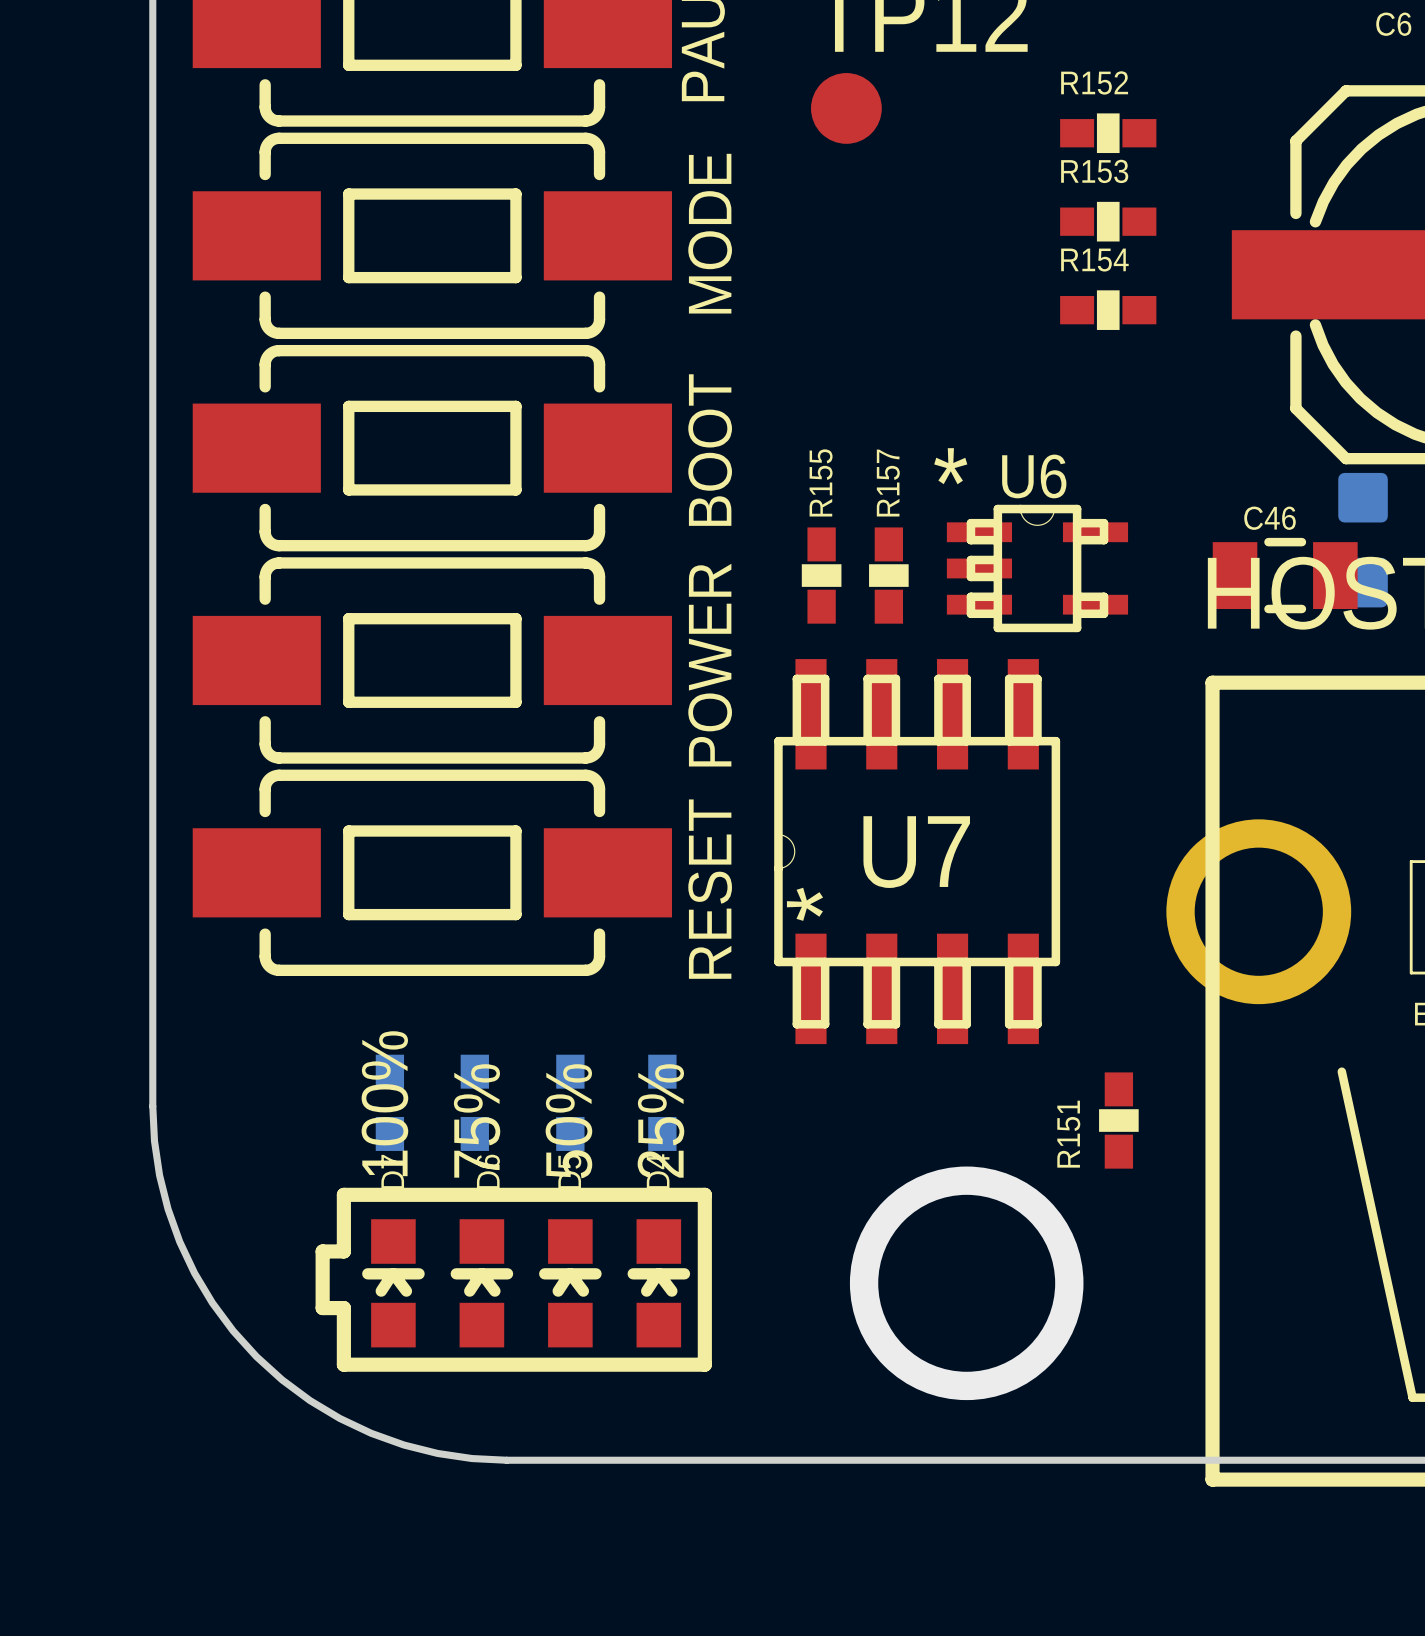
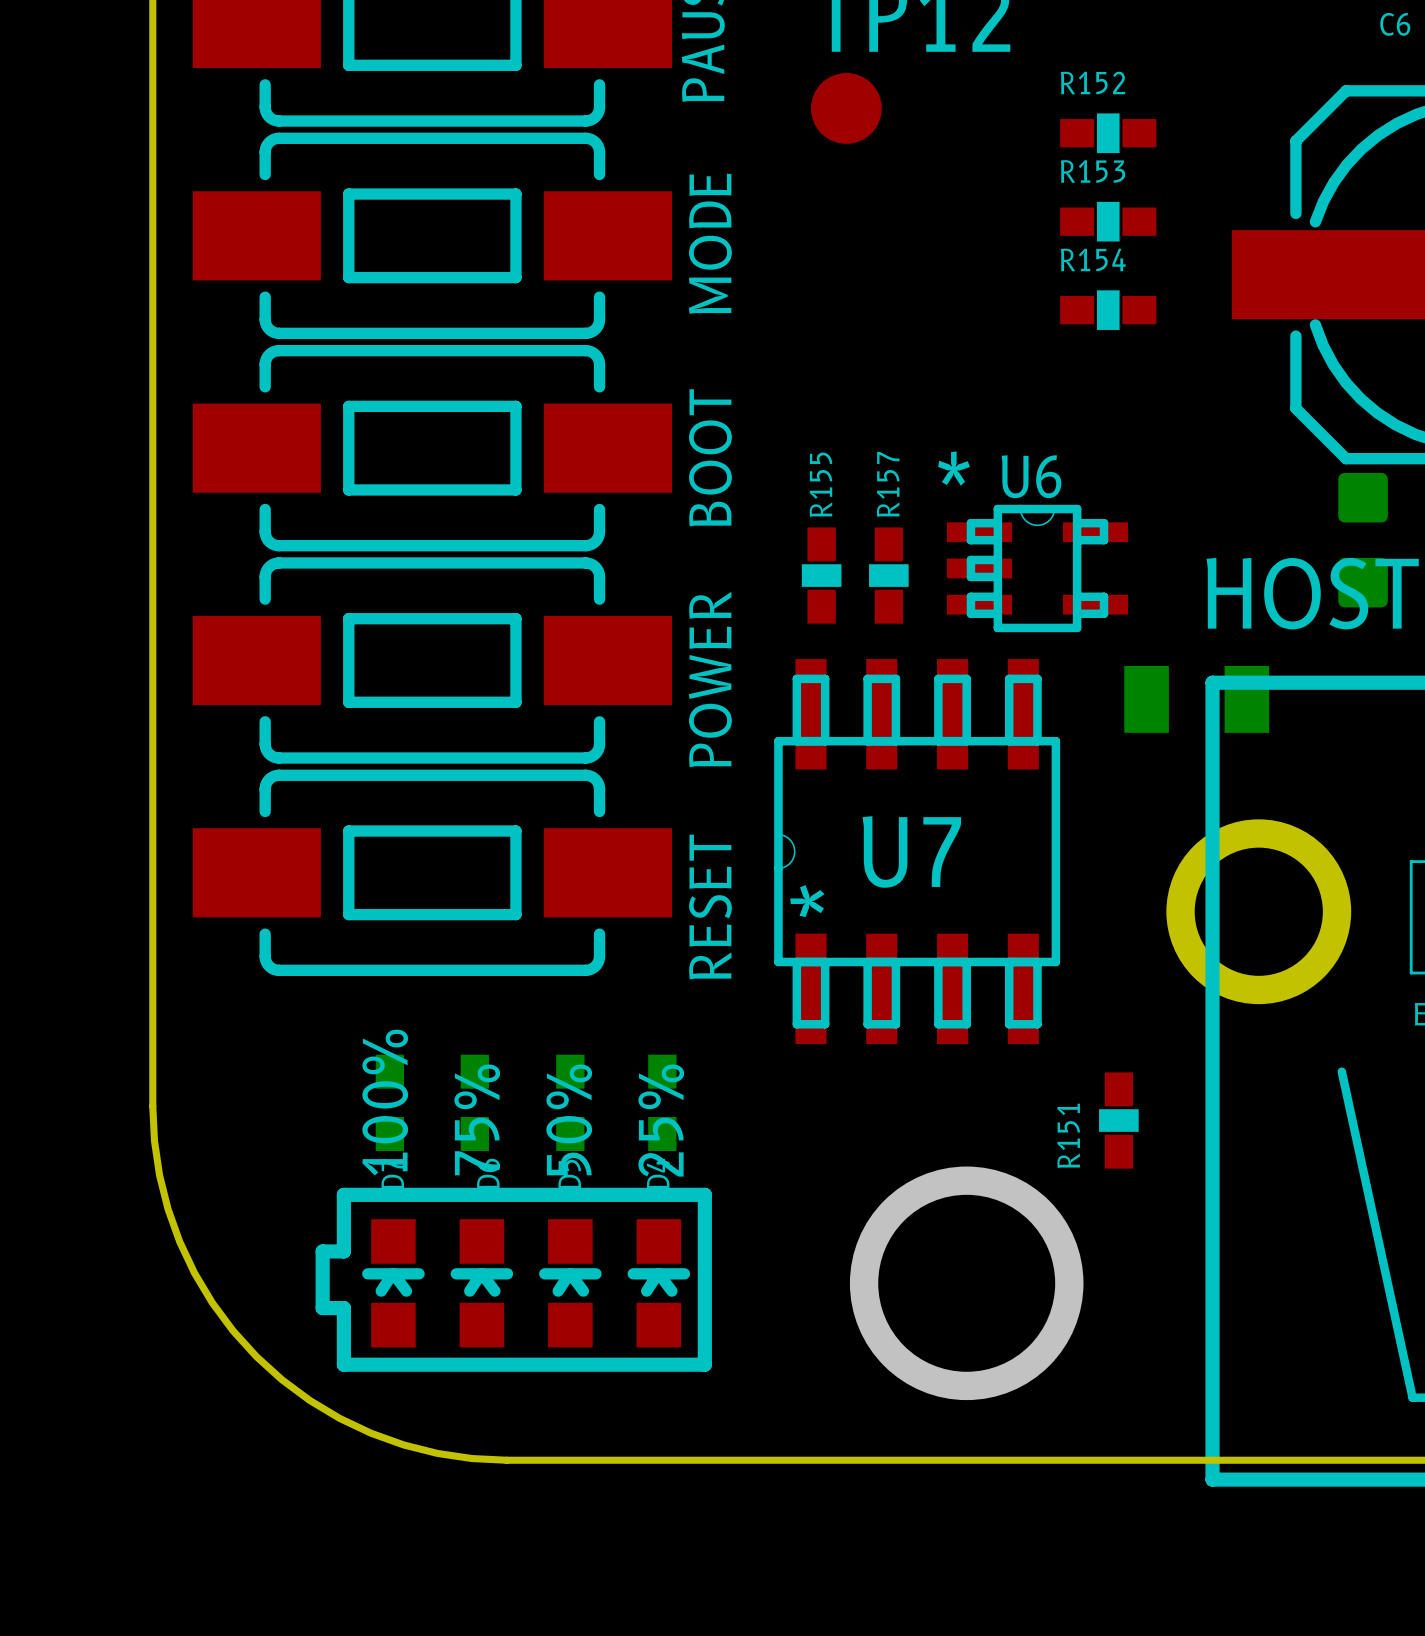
C46 side: top (1285, 575) -> bottom (1196, 699)

